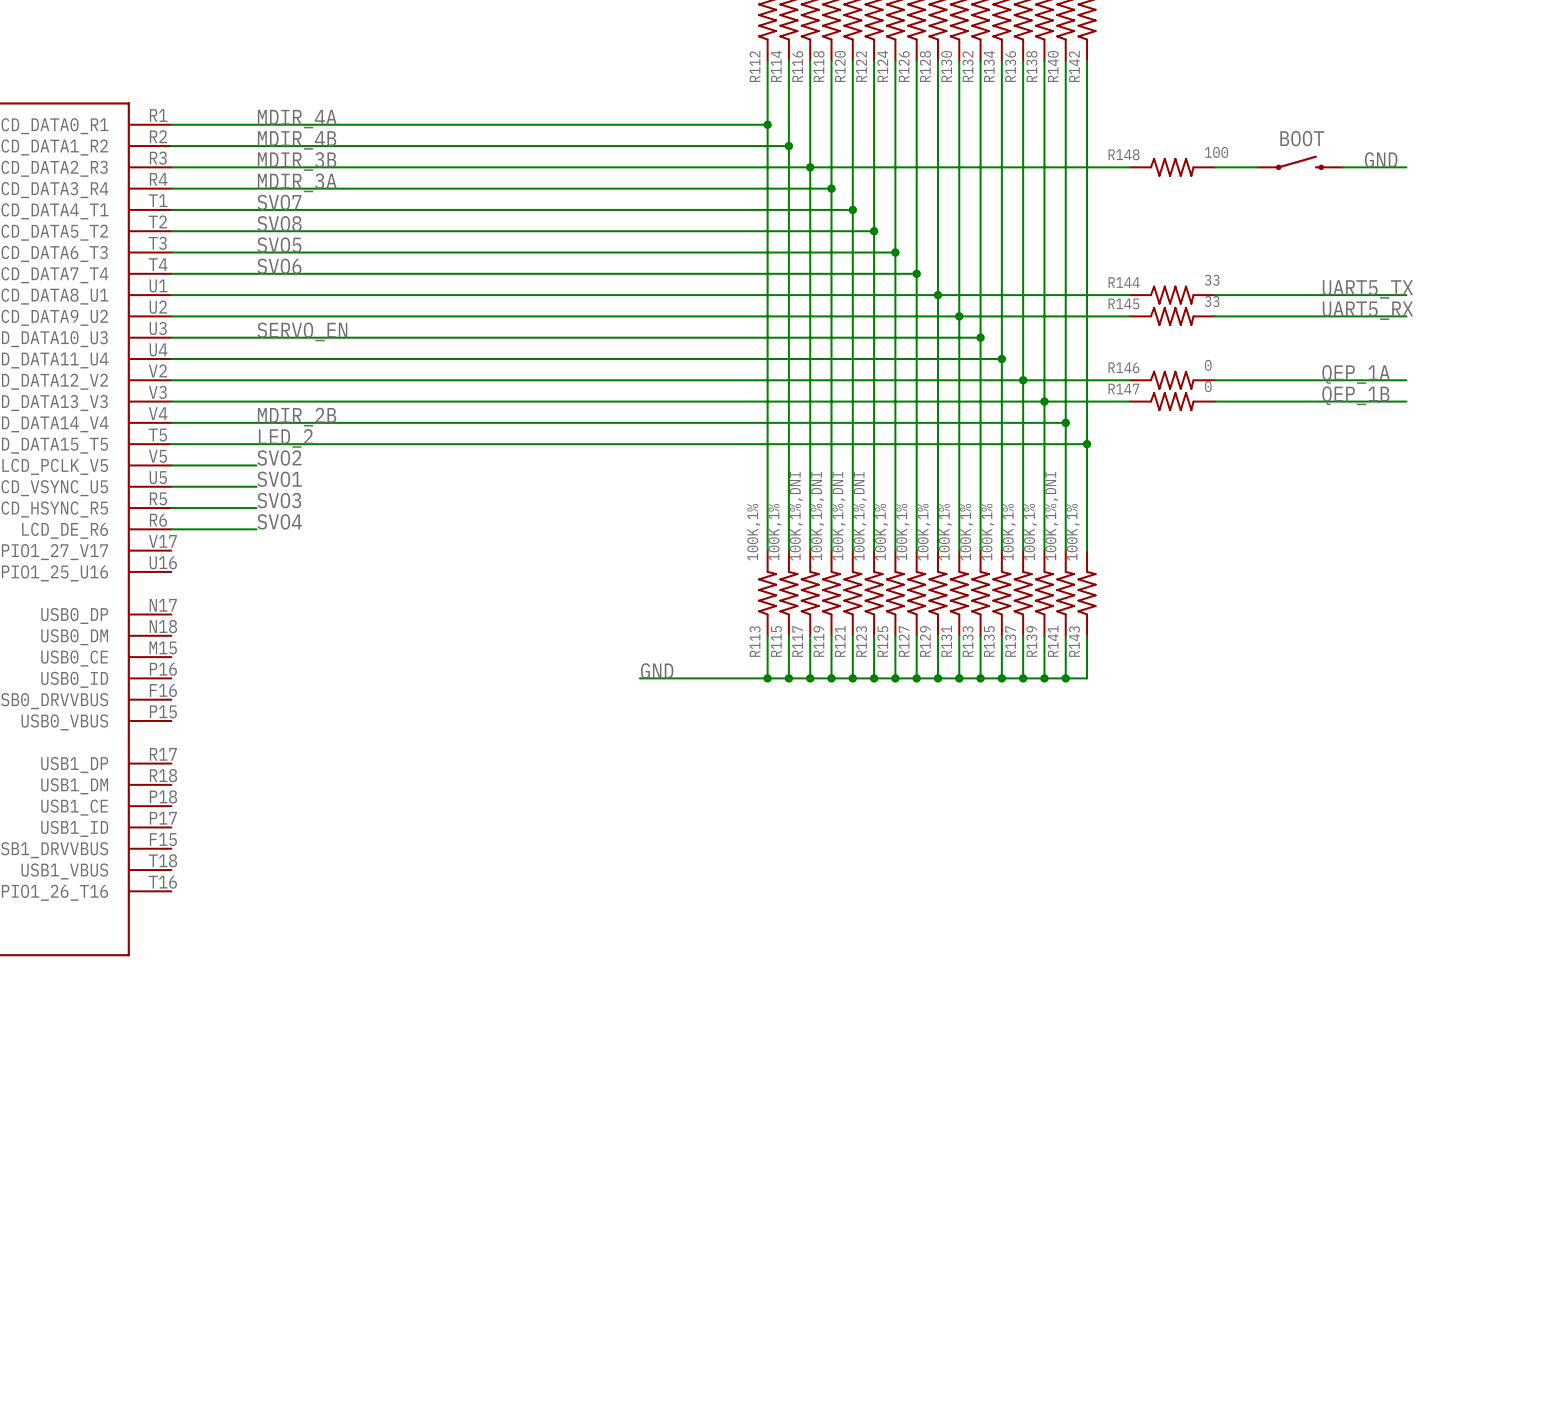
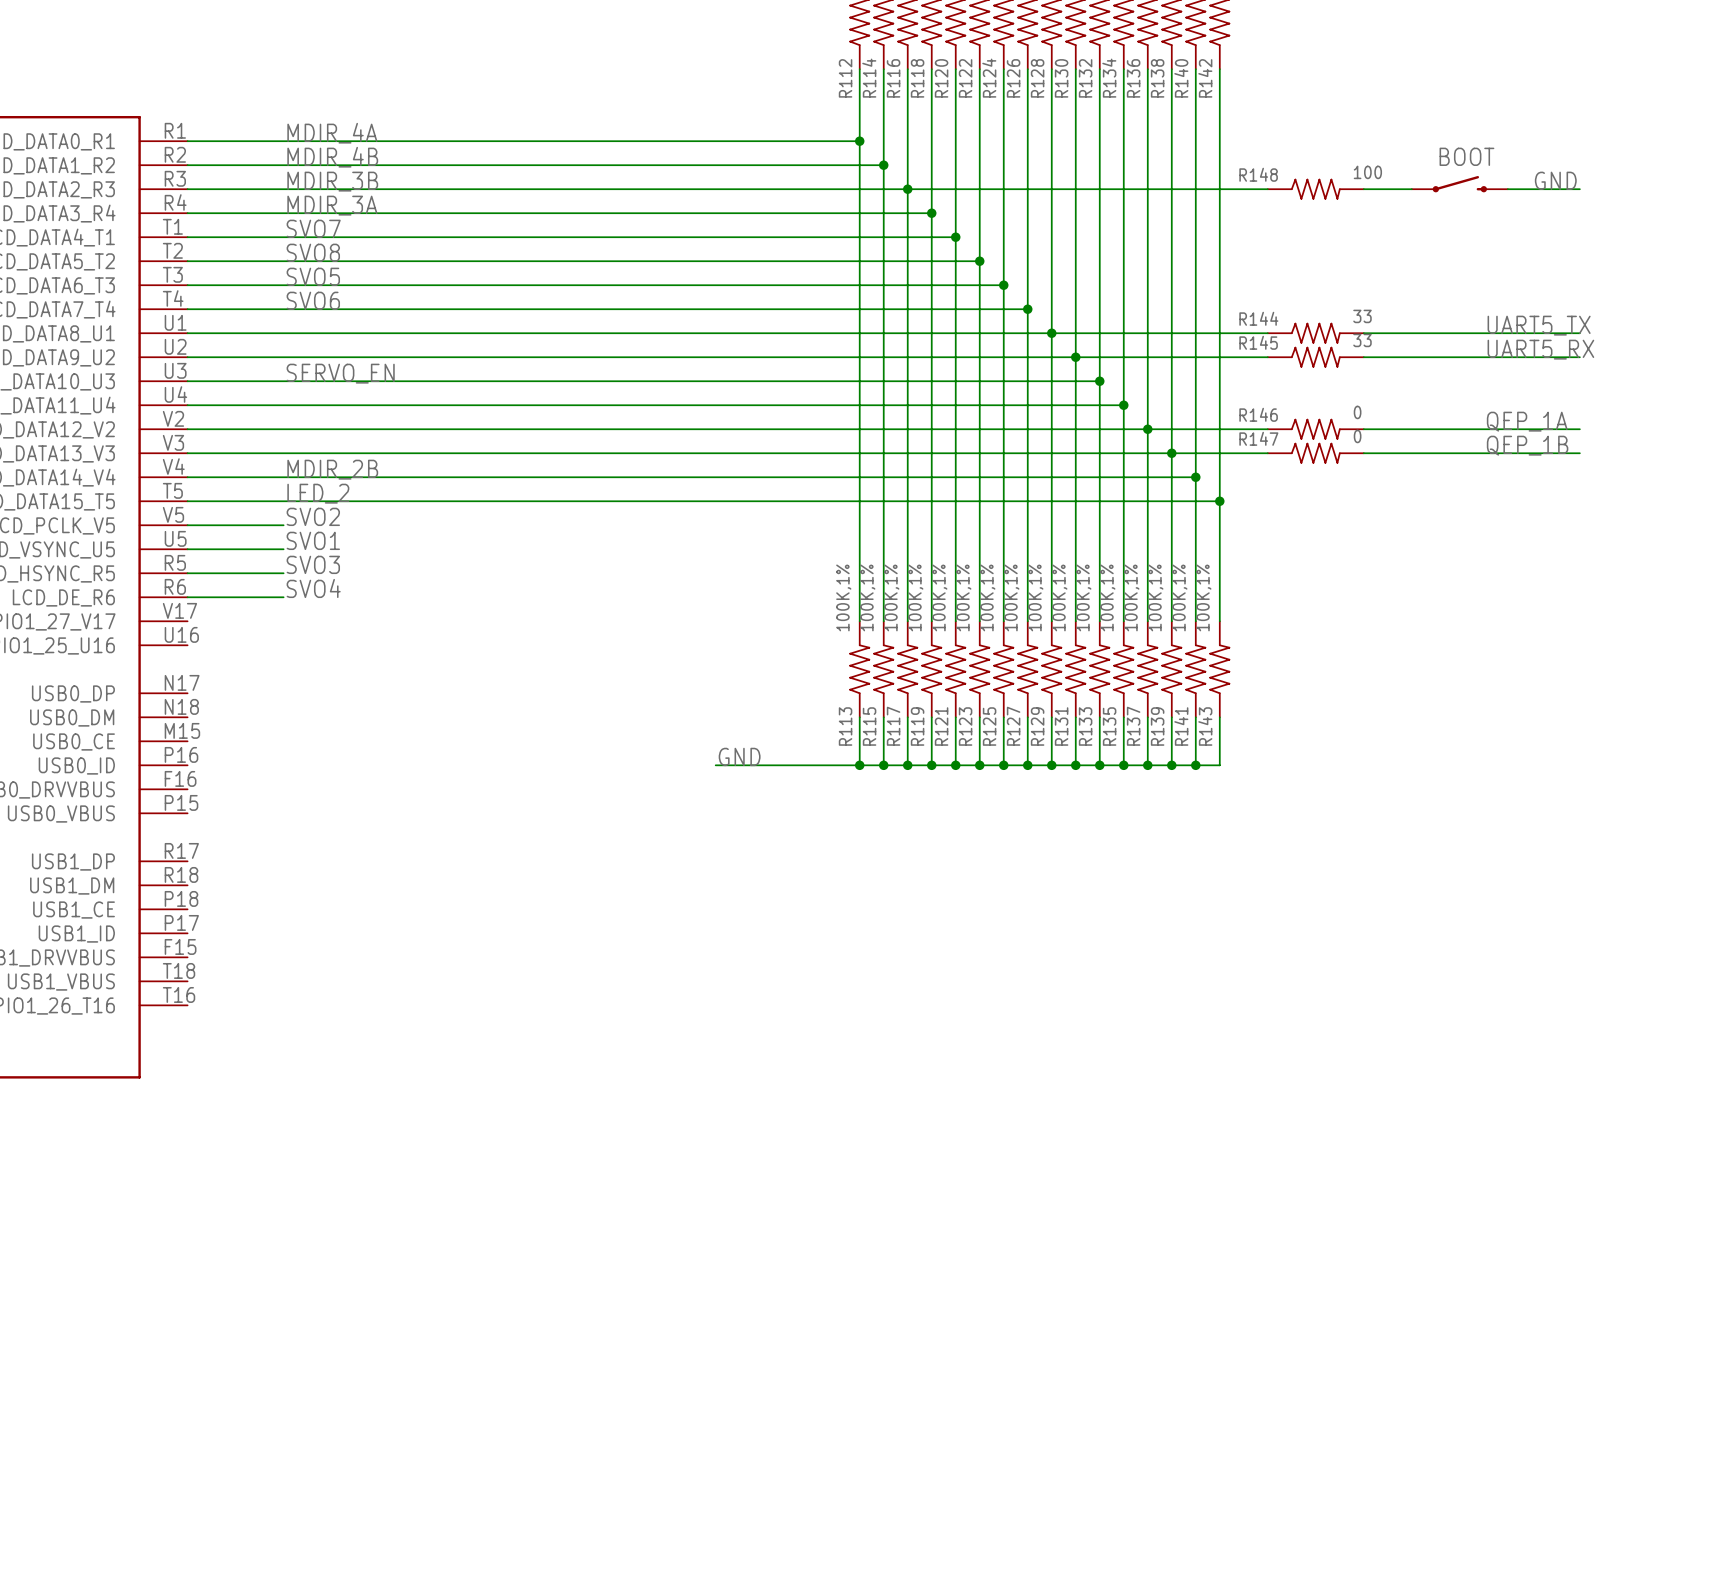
R117 value: 100K,1%,DNI (796, 516) -> 100K,1% (891, 597)
R119 value: 100K,1%,DNI (817, 516) -> 100K,1% (915, 597)
R121 value: 100K,1%,DNI (838, 516) -> 100K,1% (939, 597)
R123 value: 100K,1%,DNI (860, 516) -> 100K,1% (963, 597)
R141 value: 100K,1%,DNI (1051, 516) -> 100K,1% (1179, 597)

